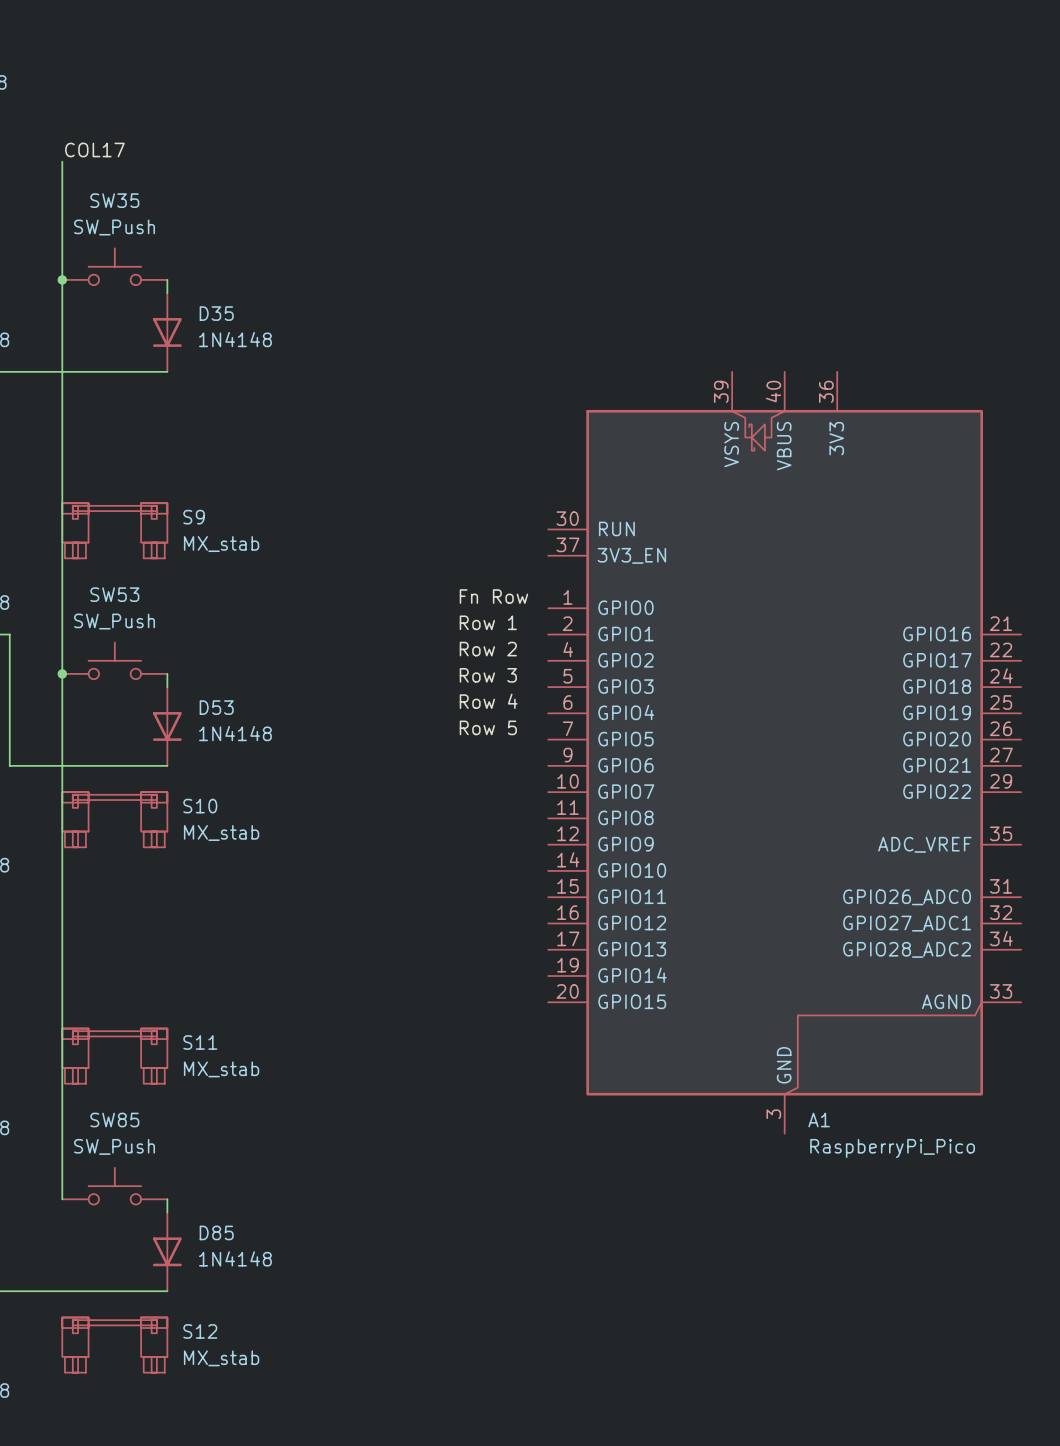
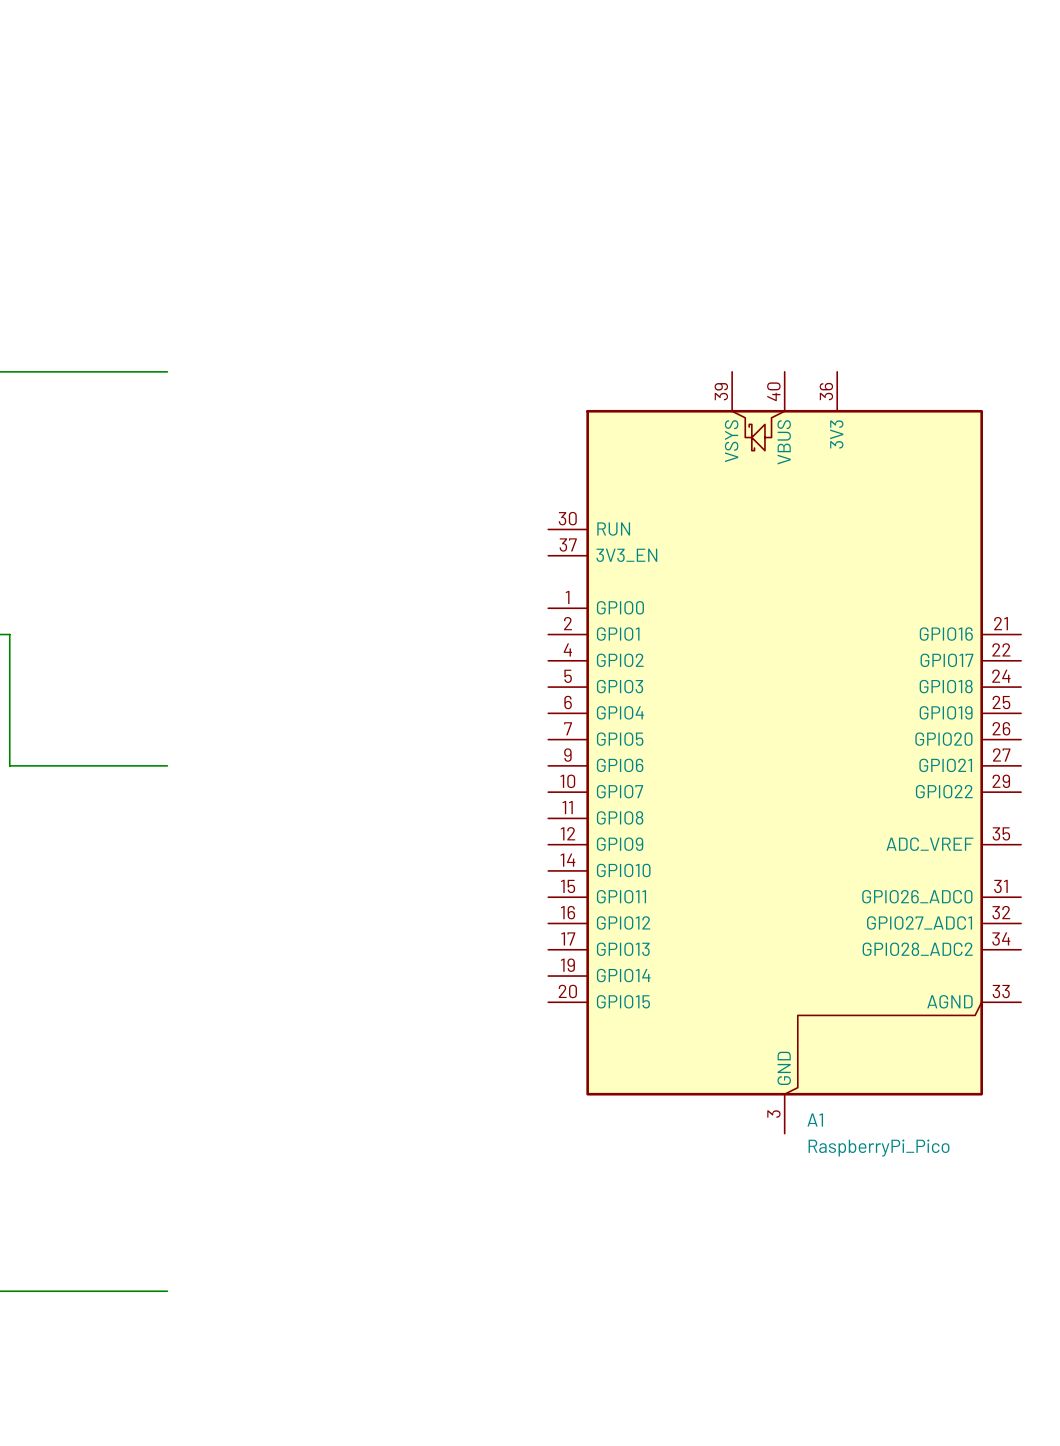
label: COL17 (94, 149) -> none
wire: (62, 161) (62, 1199) -> none
SW35: SW_Push (114, 266) -> none
junction: (62, 279) -> none
wire: (167, 279) (167, 293) -> none
D35: 1N4148 (167, 332) -> none
S9: MX_stab (114, 530) -> none
label: Fn Row (493, 596) -> none
label: Row 1 (488, 622) -> none
label: Row 2 (488, 649) -> none
SW53: SW_Push (114, 660) -> none
junction: (62, 673) -> none
wire: (167, 673) (167, 687) -> none
label: Row 3 (488, 675) -> none
label: Row 4 (488, 701) -> none
D53: 1N4148 (167, 726) -> none
label: Row 5 (488, 727) -> none
S10: MX_stab (114, 819) -> none
S11: MX_stab (114, 1056) -> none
SW85: SW_Push (114, 1186) -> none
wire: (167, 1199) (167, 1212) -> none
D85: 1N4148 (167, 1251) -> none
S12: MX_stab (114, 1345) -> none

